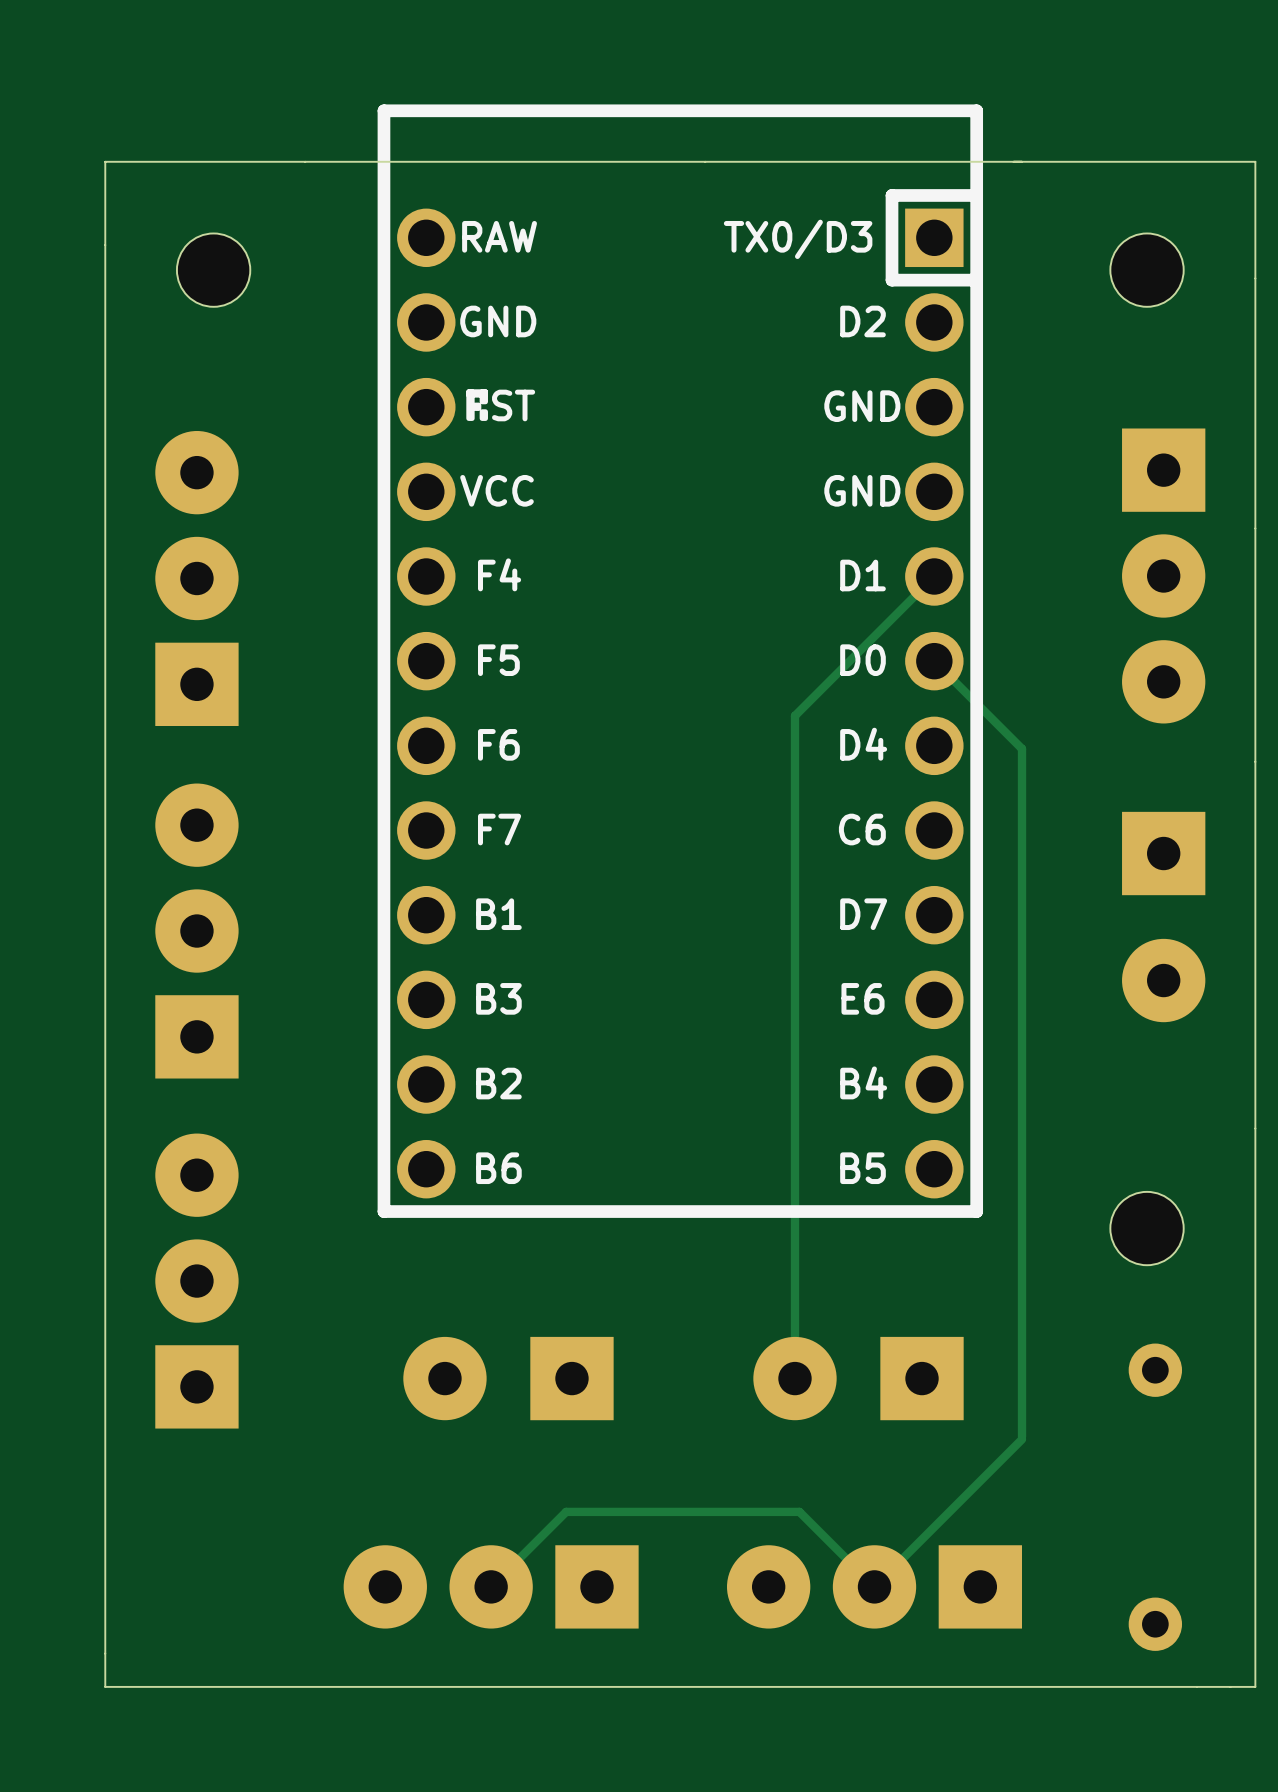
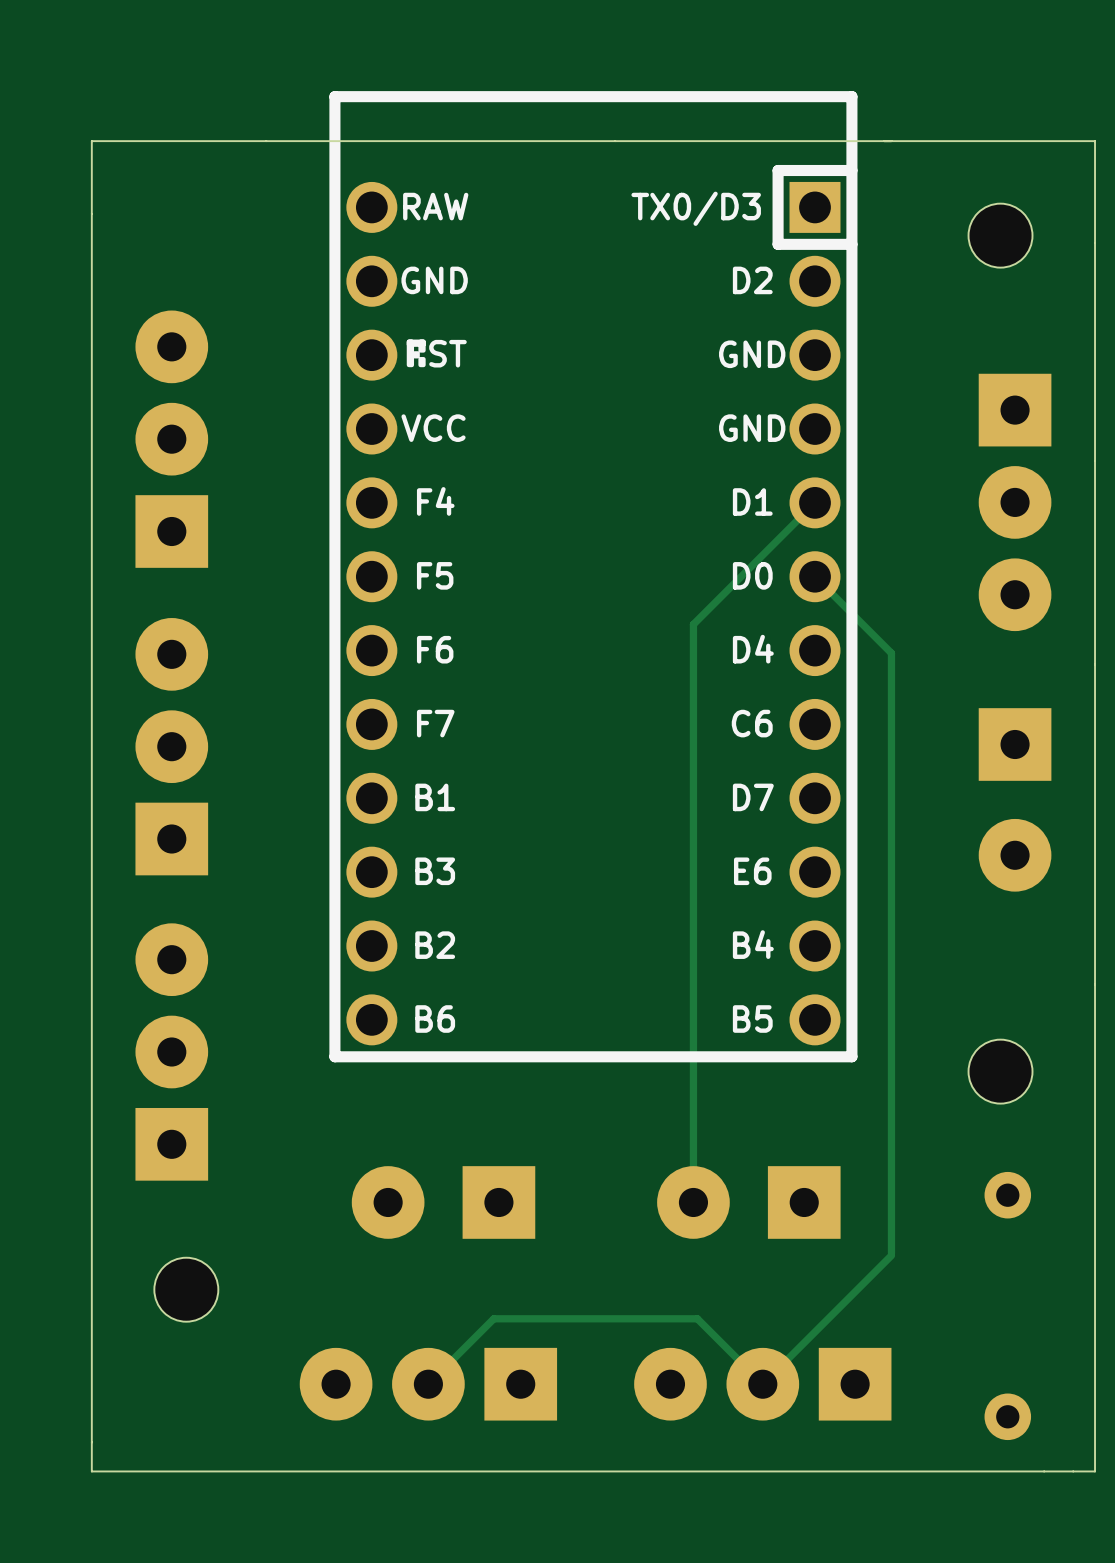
part: (213, 270) -> none
part position: (196, 578) -> (171, 439)
part position: (196, 931) -> (171, 746)
part position: (196, 1281) -> (171, 1052)
part: none -> (186, 1289)

